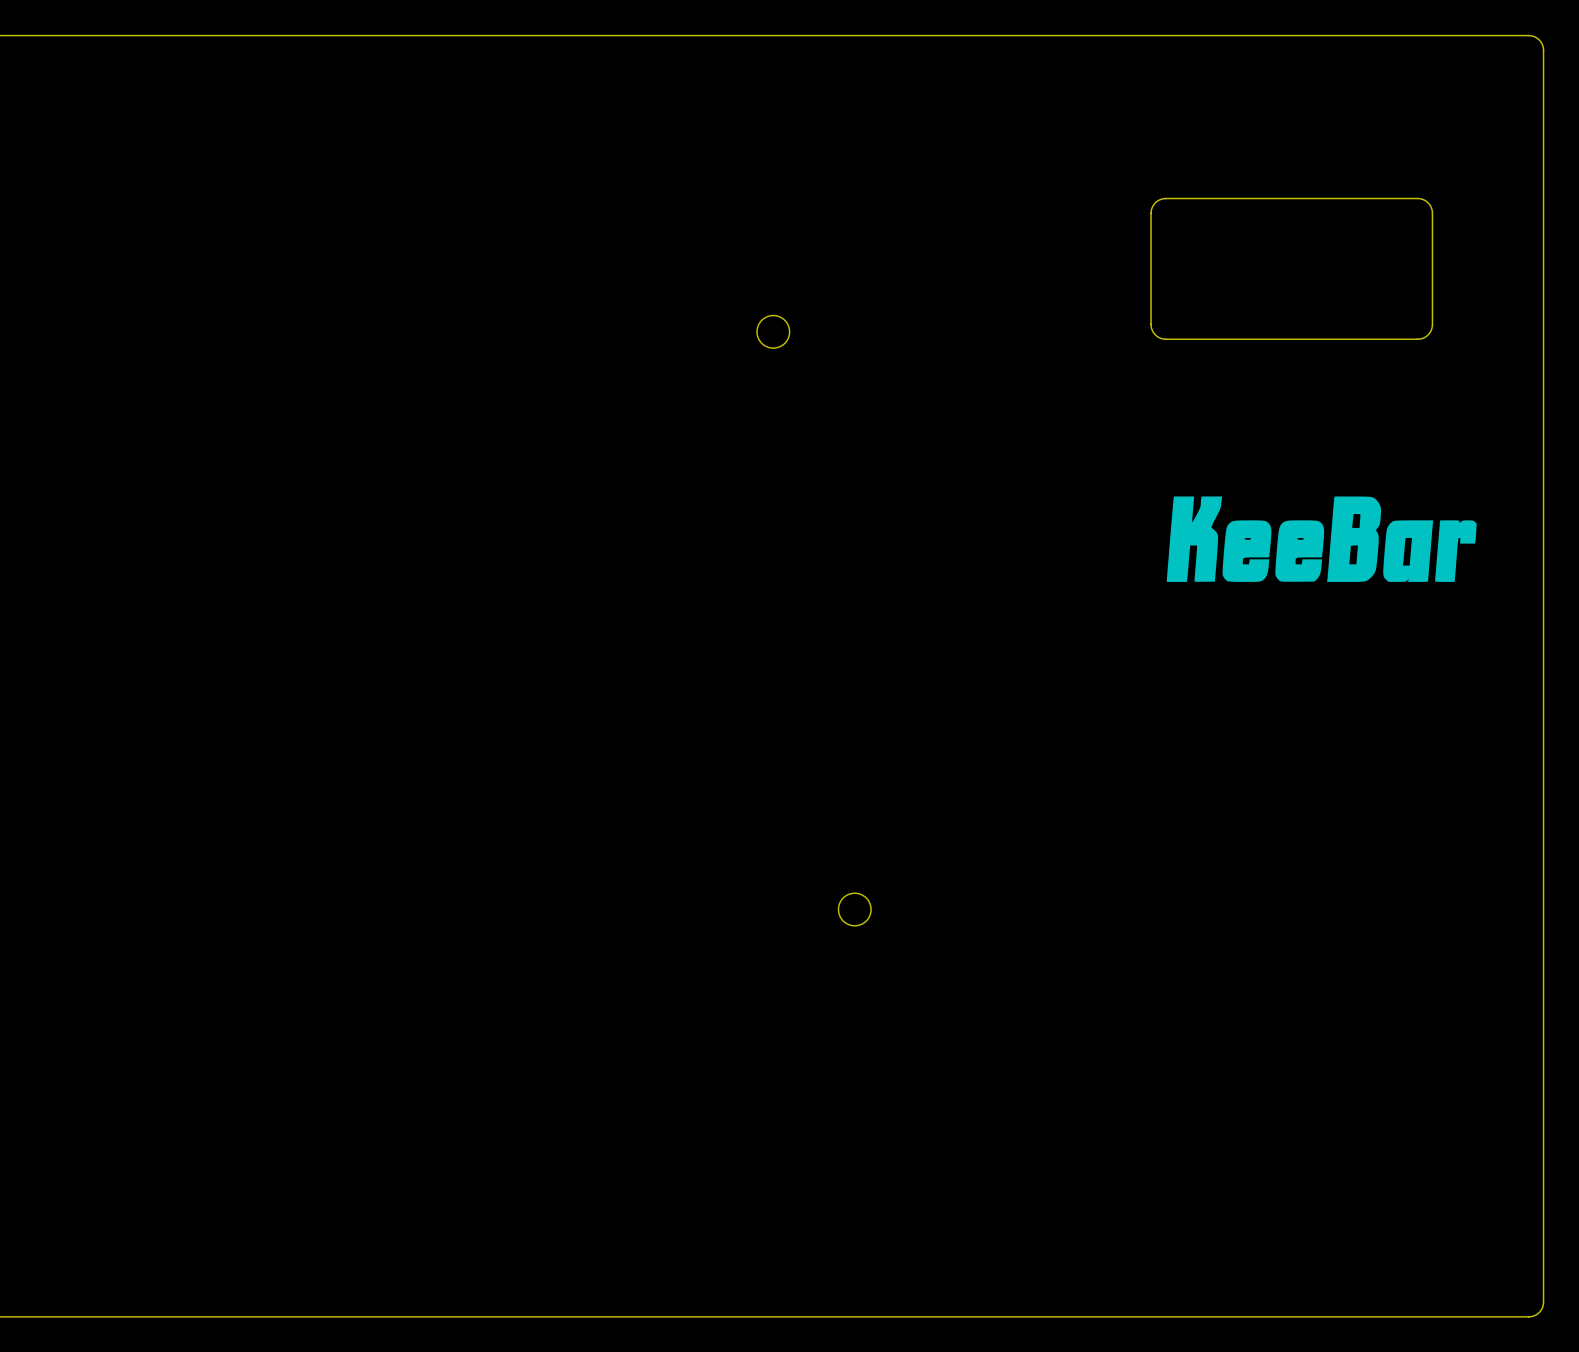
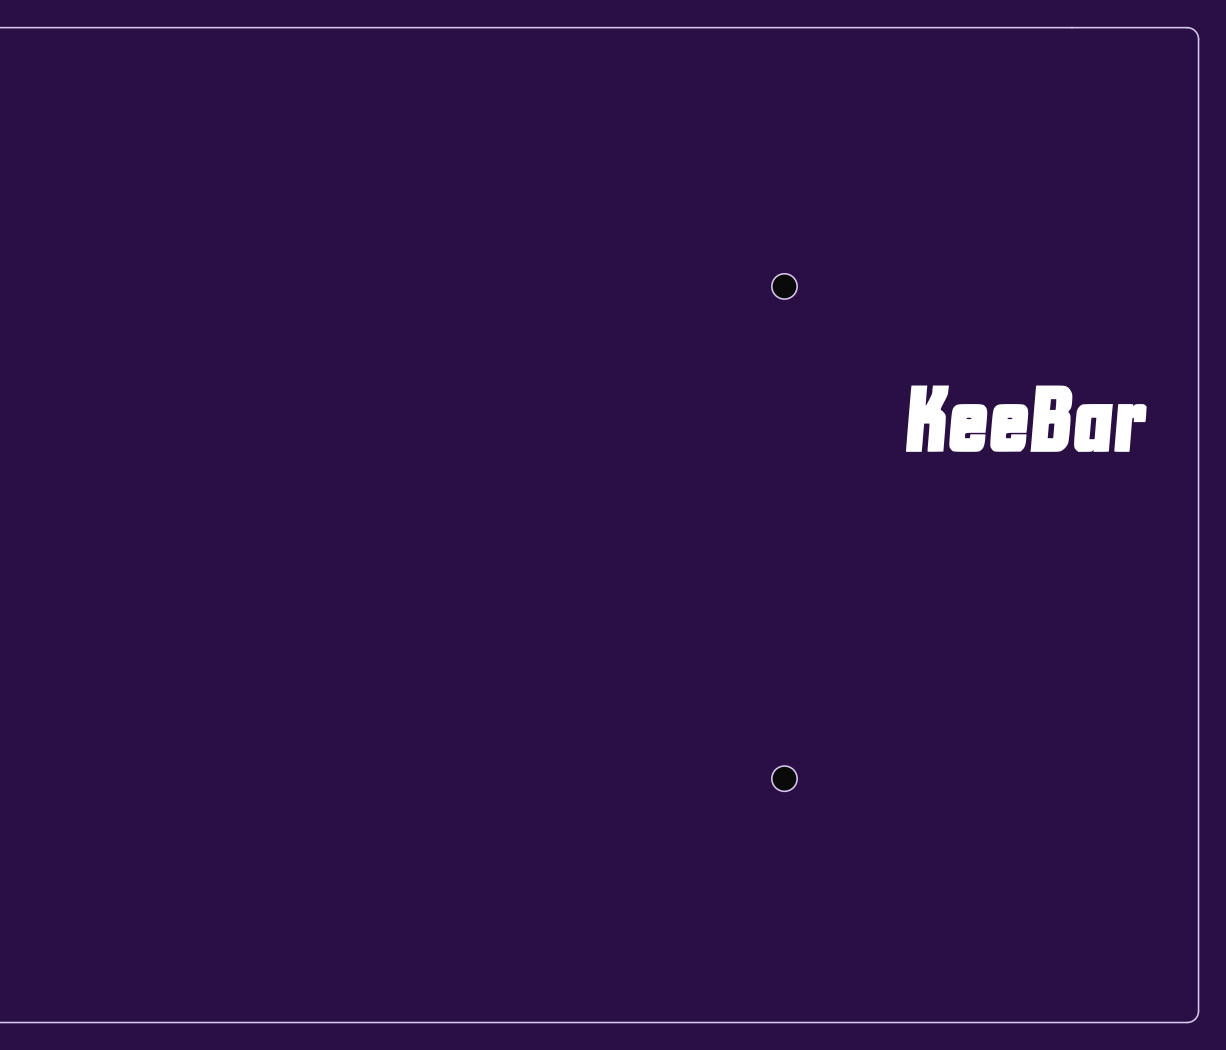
board edge: (1165, 198) (1424, 199) (1430, 205) (1432, 213) (1430, 330) (1425, 336) (1417, 339) (1159, 337) (1153, 332) (1151, 326) (1151, 213) (1155, 202) (1165, 198) -> none
drawing: [756, 315, 790, 349] -> none
part: none -> (784, 286)
drawing: [838, 893, 872, 926] -> none
part: none -> (784, 778)

